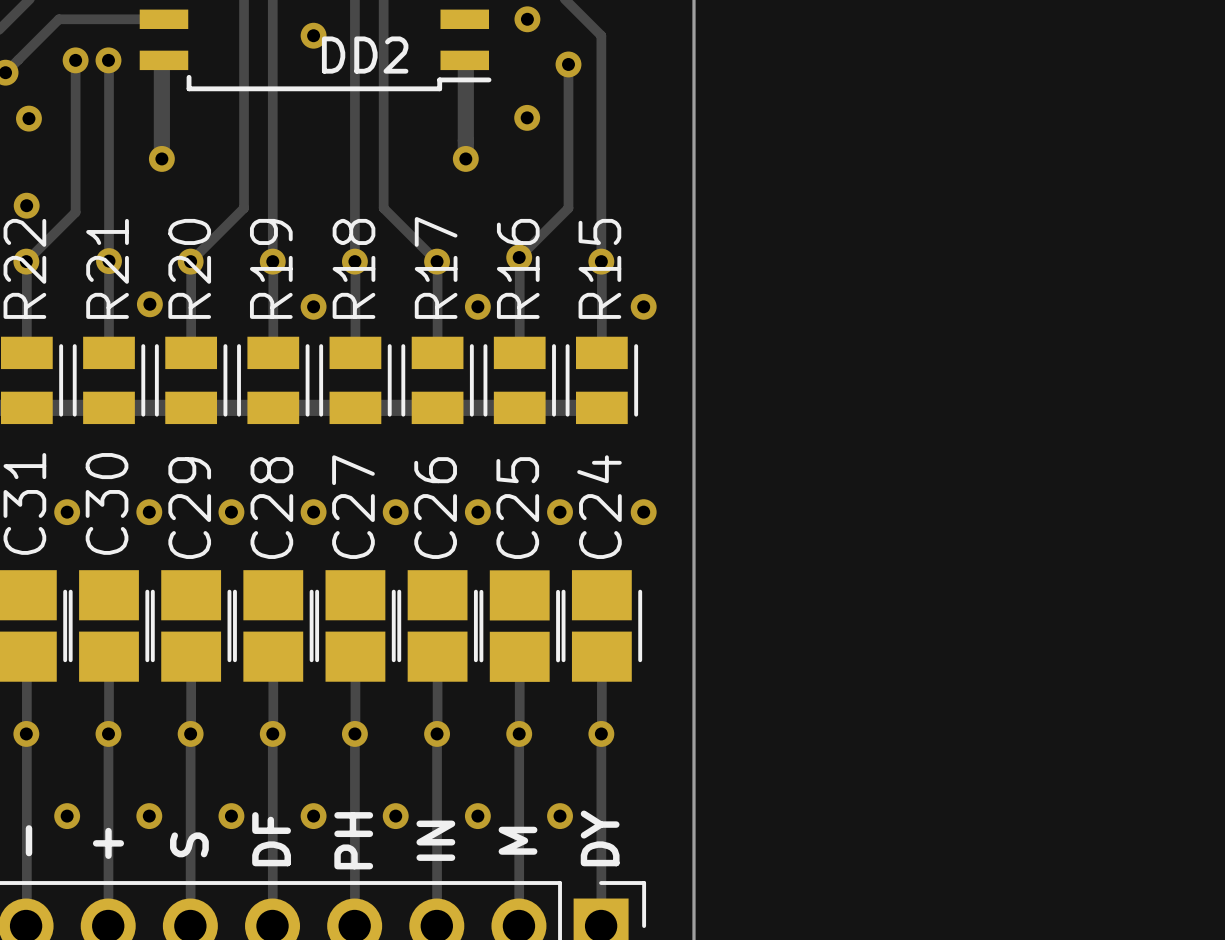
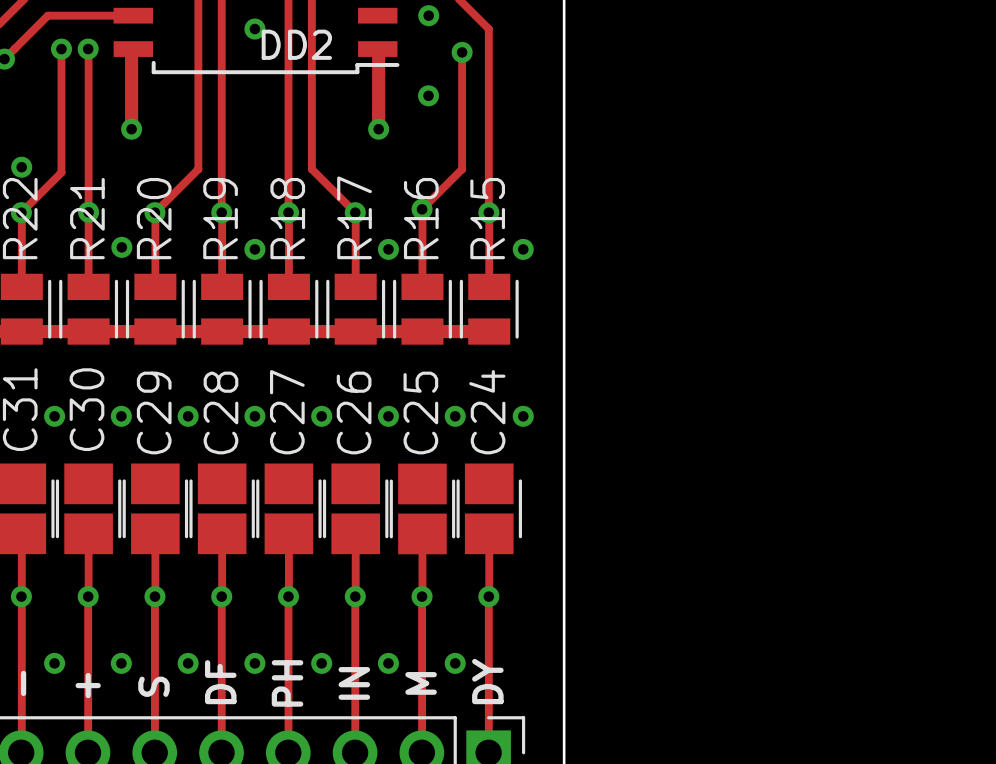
via: (28, 118) -> none

